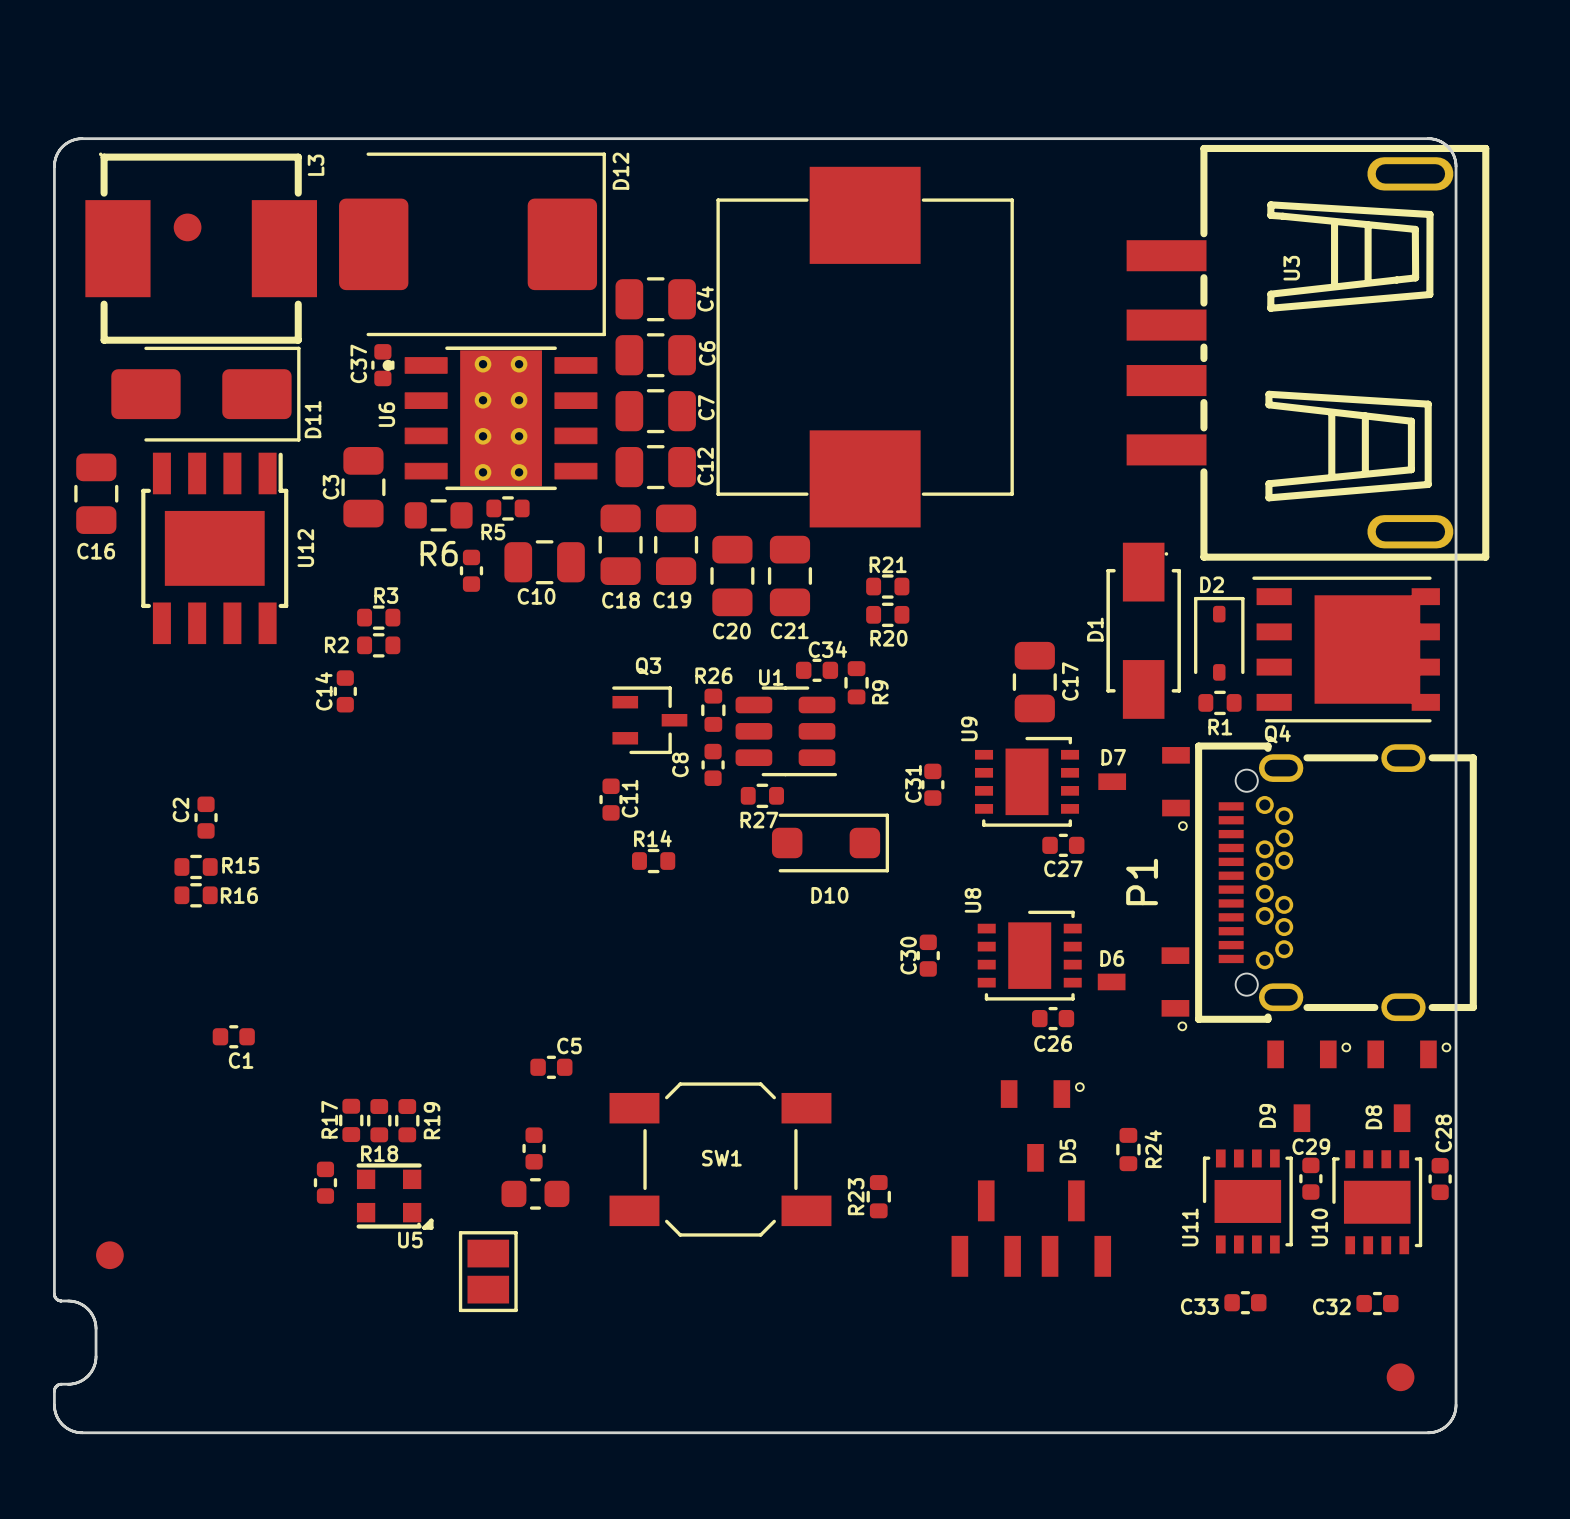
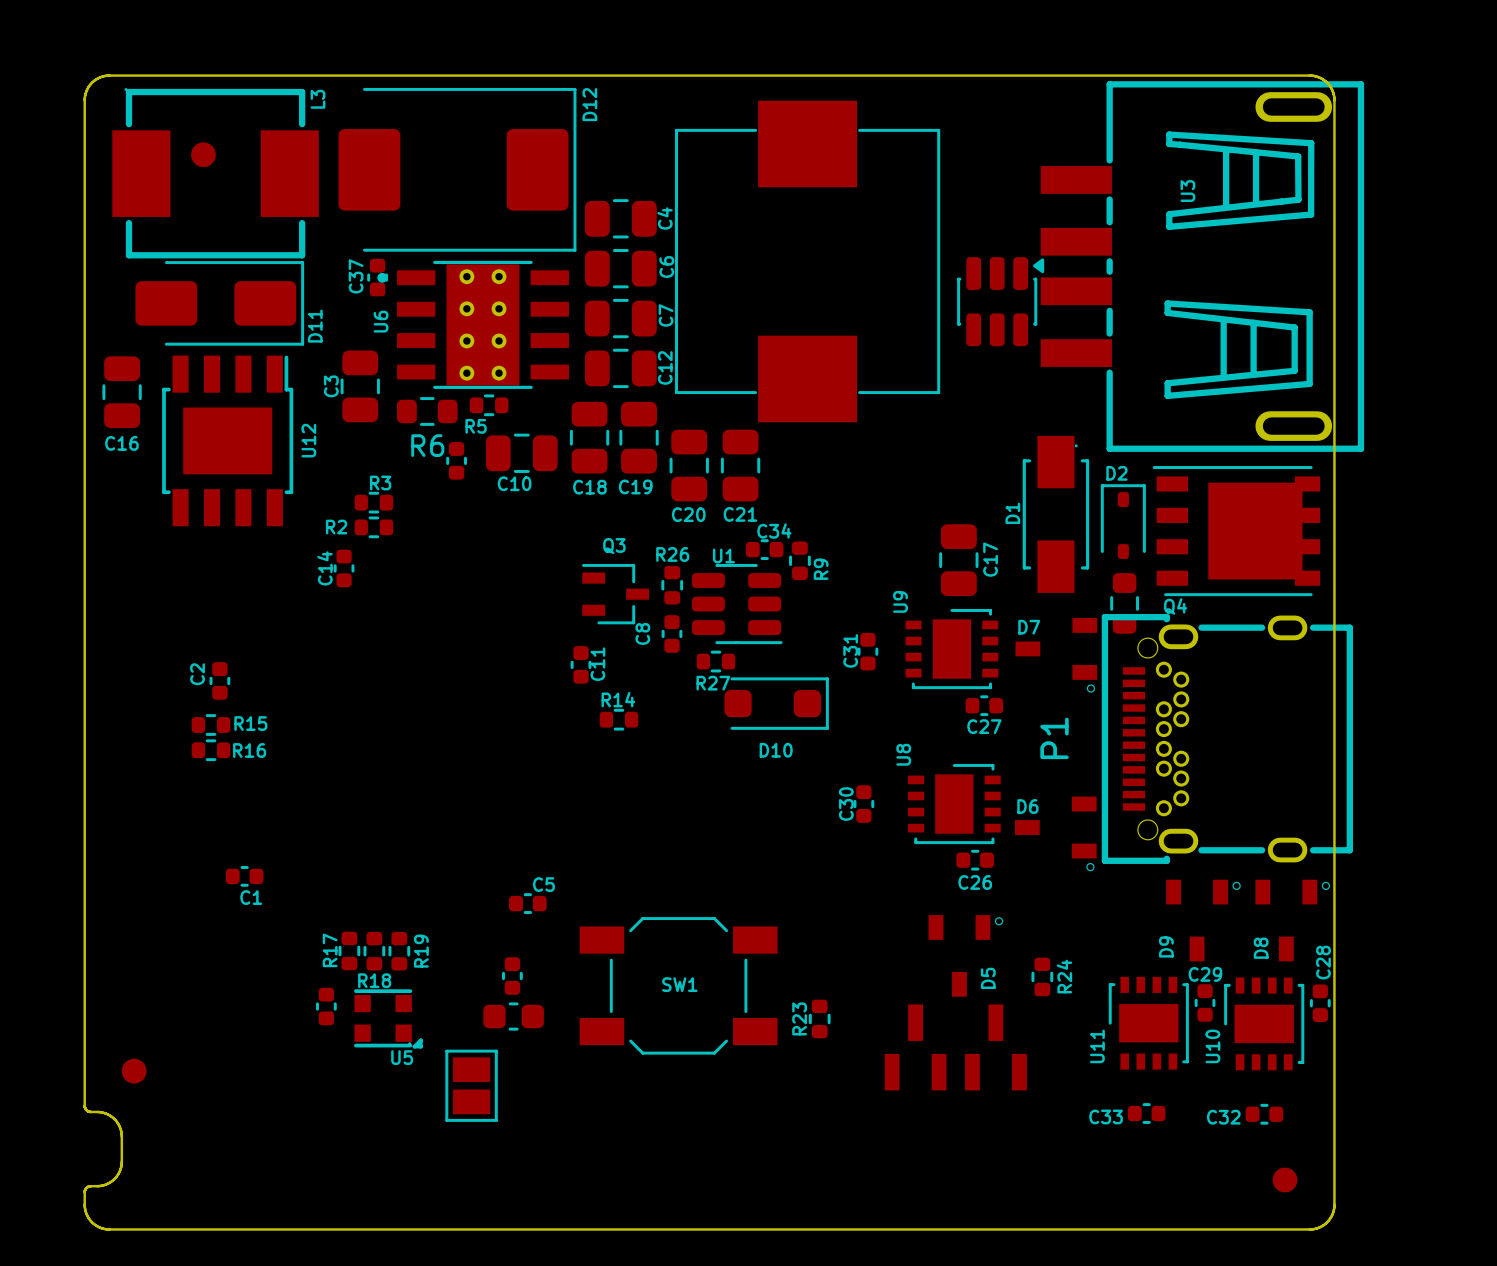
part: none -> (1000, 301)
R21: (887, 586) -> none
R20: (887, 614) -> none
R1: (1219, 702) -> none
part: none -> (1124, 603)

